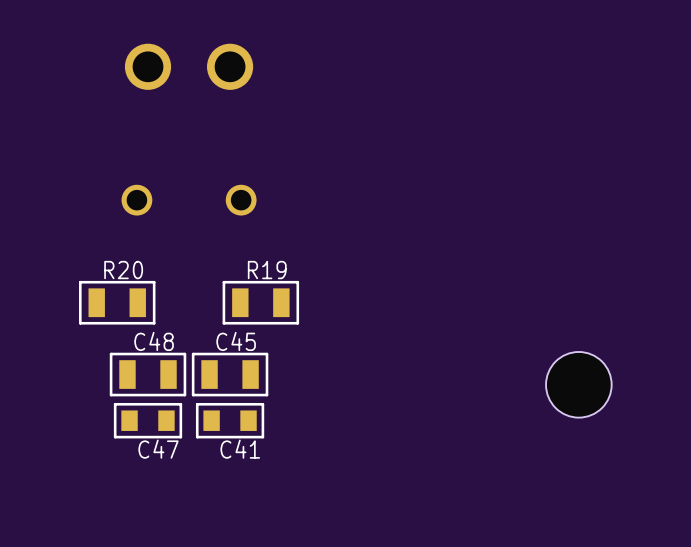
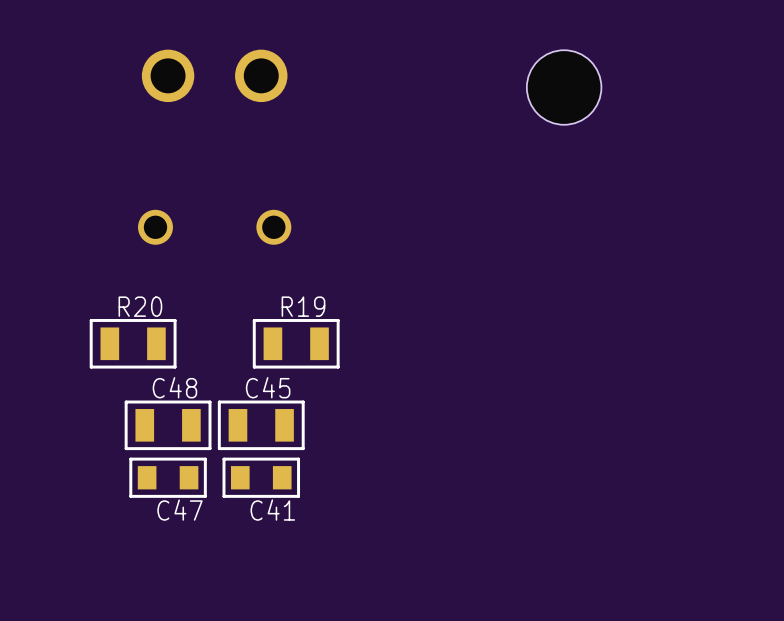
part position: (578, 384) -> (564, 87)

